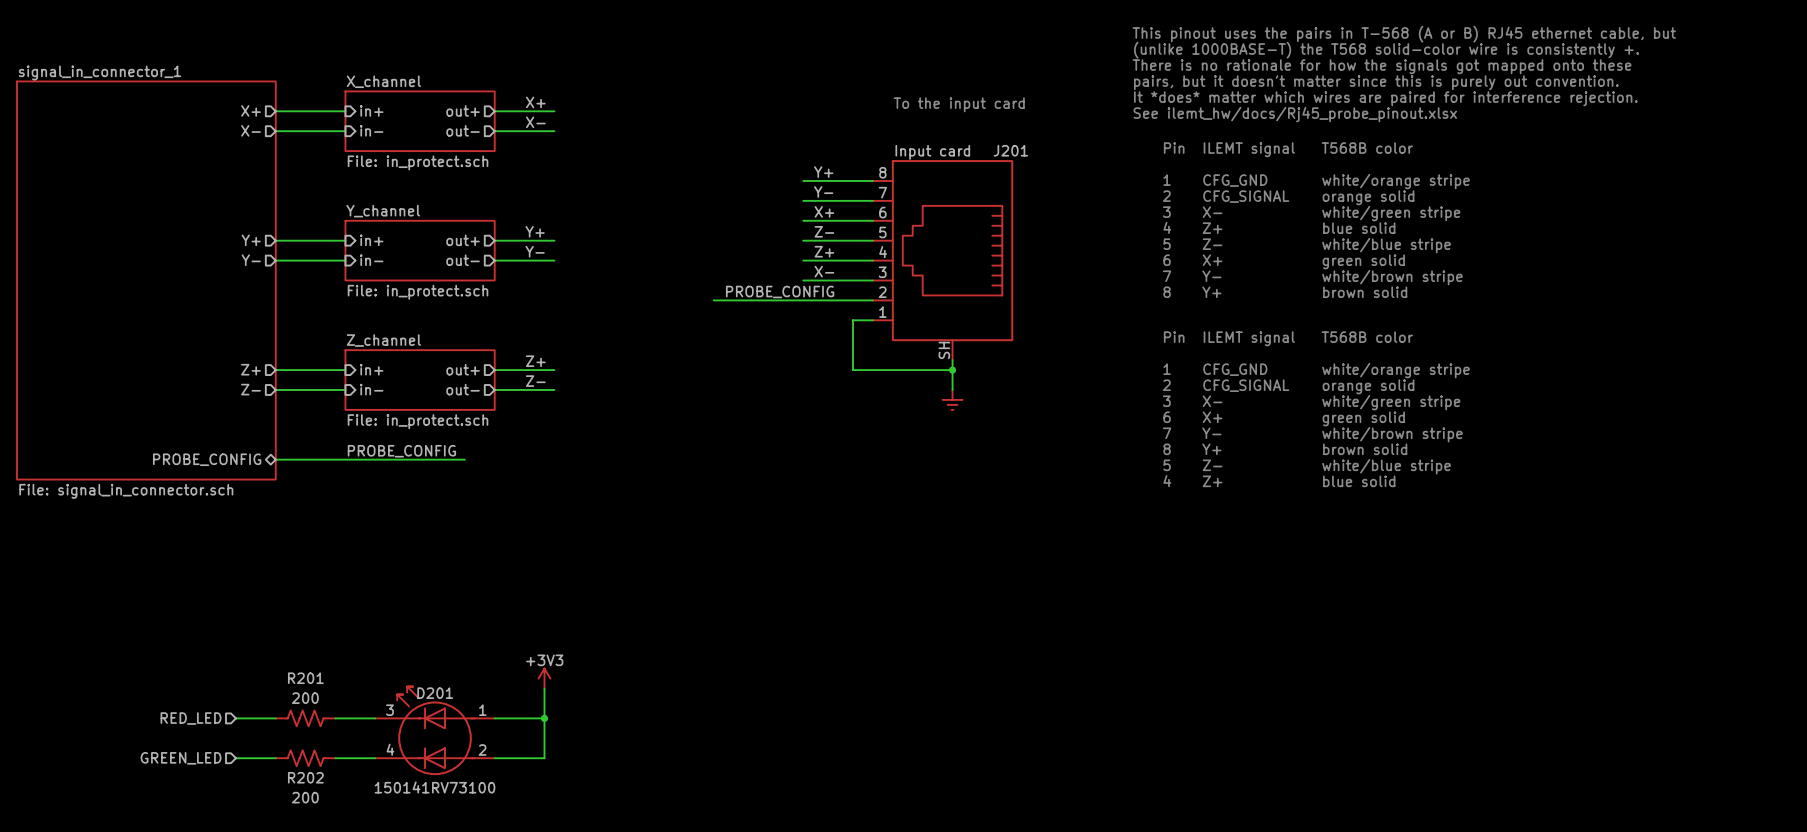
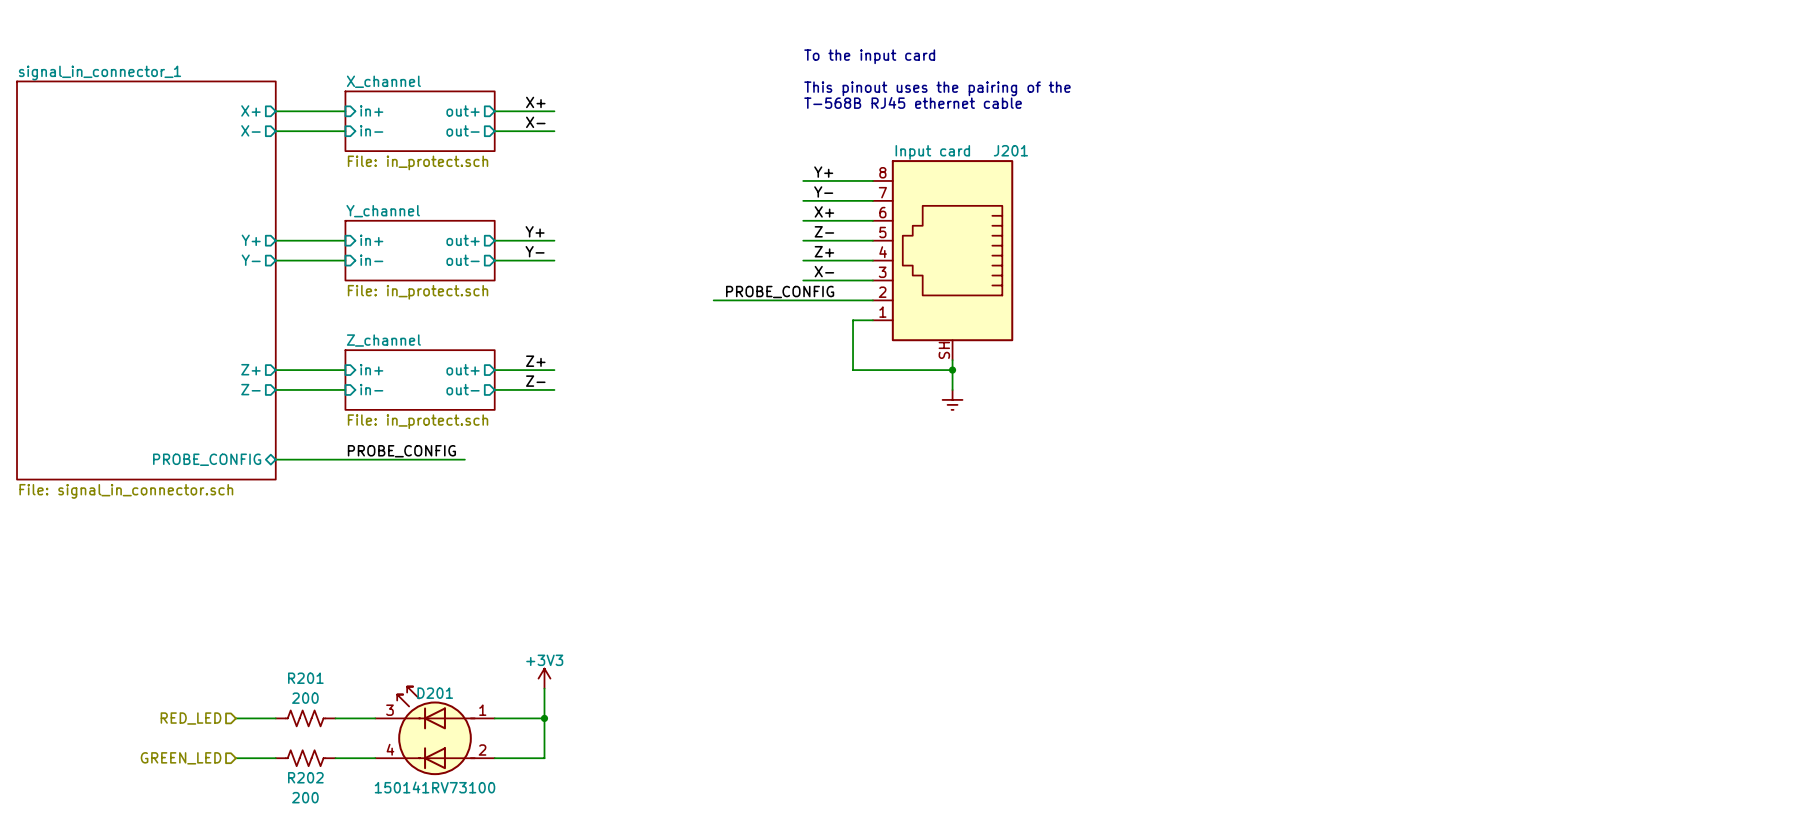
text: This pinout uses the pairs in T-568 (A or B) RJ45 ethernet cable, but (1404, 34) -> none
text: (unlike 1000BASE-T) the T568 solid-color wire is consistently +. (1386, 50) -> none
text: There is no rationale for how the signals got mapped onto these (1382, 66) -> none
text: pairs, but it doesn't matter since this is purely out convention. (1376, 82) -> none
text: none -> This pinout uses the pairing of the (937, 88)
text: It *does* matter which wires are paired for interference rejection. (1385, 98) -> none
text: none -> T-568B RJ45 ethernet cable (913, 102)
text position: To the input card (959, 104) -> To the input card (869, 56)
text: See ilemt_hw/docs/Rj45_probe_pinout.xlsx (1295, 114) -> none
text: Pin (1174, 148) -> none
text: T568B color (1367, 148) -> none
text: ILEMT signal (1249, 149) -> none
text: 1 (1167, 180) -> none
text: CFG_GND (1235, 180) -> none
text: white/orange stripe (1395, 181) -> none
text: 2 (1166, 196) -> none
text: CFG_SIGNAL (1246, 196) -> none
text: orange solid (1368, 197) -> none
text: 3 (1166, 212) -> none
text: X- (1212, 212) -> none
text: white/green stripe (1391, 213) -> none
text: 4 (1167, 227) -> none
text: Z+ (1212, 228) -> none
text: blue solid (1359, 228) -> none
text: 5 (1167, 244) -> none
text: Z- (1212, 244) -> none
text: white/blue stripe (1386, 245) -> none
text: 6 (1167, 260) -> none
text: X+ (1212, 260) -> none
text: green solid (1363, 261) -> none
text: 7 (1167, 276) -> none
text: Y- (1211, 276) -> none
text: white/brown stripe (1392, 277) -> none
text: 8 (1167, 292) -> none
text: Y+ (1211, 292) -> none
text: brown solid (1365, 292) -> none
text: Pin (1174, 337) -> none
text: T568B color (1367, 337) -> none
text: ILEMT signal (1249, 338) -> none
text: 1 (1167, 369) -> none
text: CFG_GND (1235, 369) -> none
text: white/orange stripe (1395, 370) -> none
text: 2 (1166, 385) -> none
text: CFG_SIGNAL (1246, 385) -> none
text: orange solid (1368, 386) -> none
text: 3 (1166, 401) -> none
text: X- (1212, 401) -> none
text: white/green stripe (1391, 402) -> none
text: 6 (1167, 417) -> none
text: X+ (1212, 417) -> none
text: green solid (1363, 418) -> none
text: 7 (1167, 433) -> none
text: Y- (1211, 433) -> none
text: white/brown stripe (1392, 434) -> none
text: 8 (1167, 449) -> none
text: Y+ (1211, 449) -> none
text: brown solid (1365, 449) -> none
text: 5 (1167, 465) -> none
text: Z- (1212, 465) -> none
text: white/blue stripe (1386, 466) -> none
text: 4 (1167, 481) -> none
text: Z+ (1212, 481) -> none
text: blue solid (1359, 481) -> none

